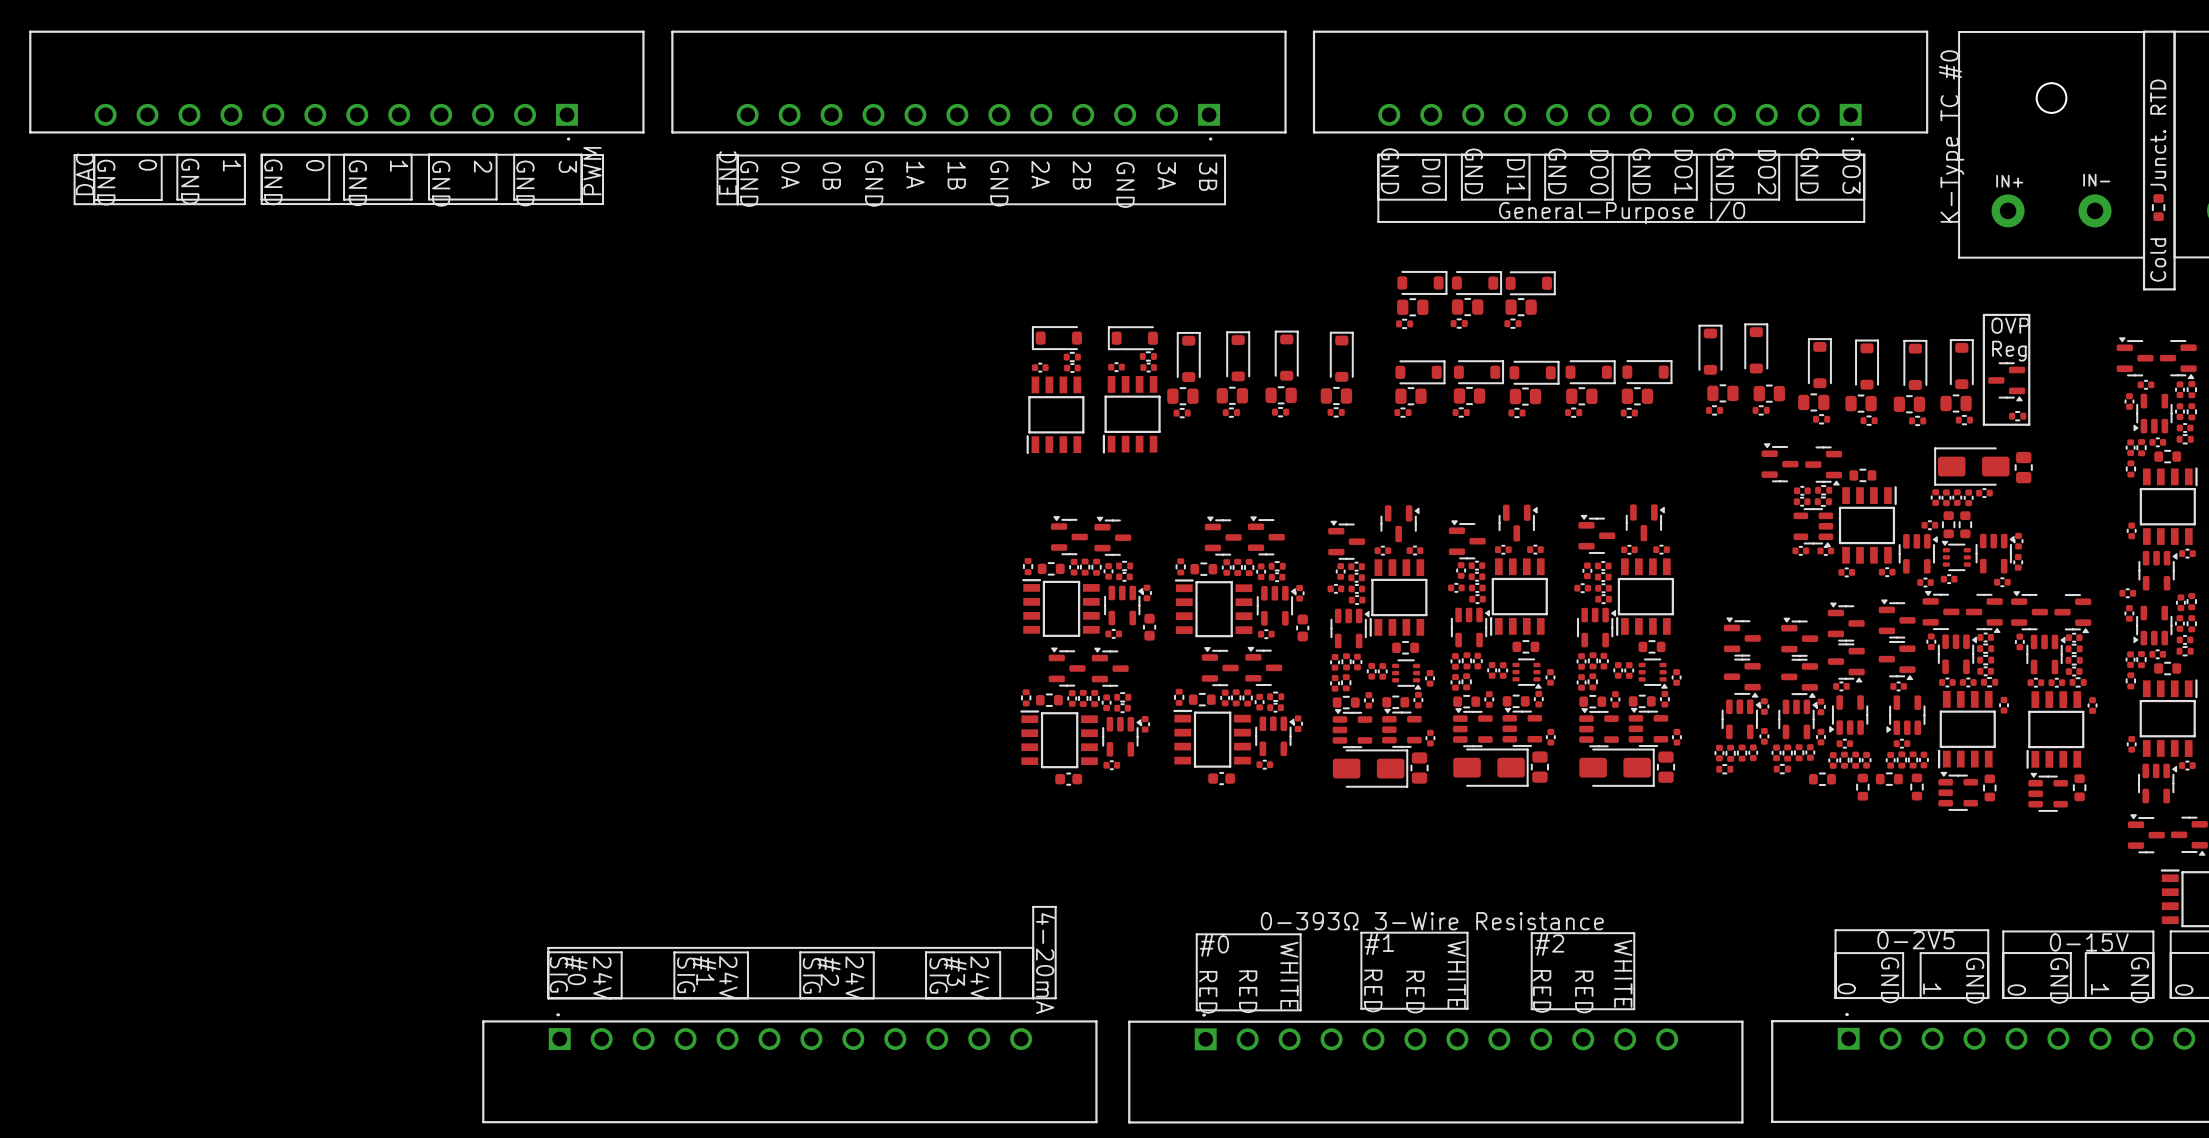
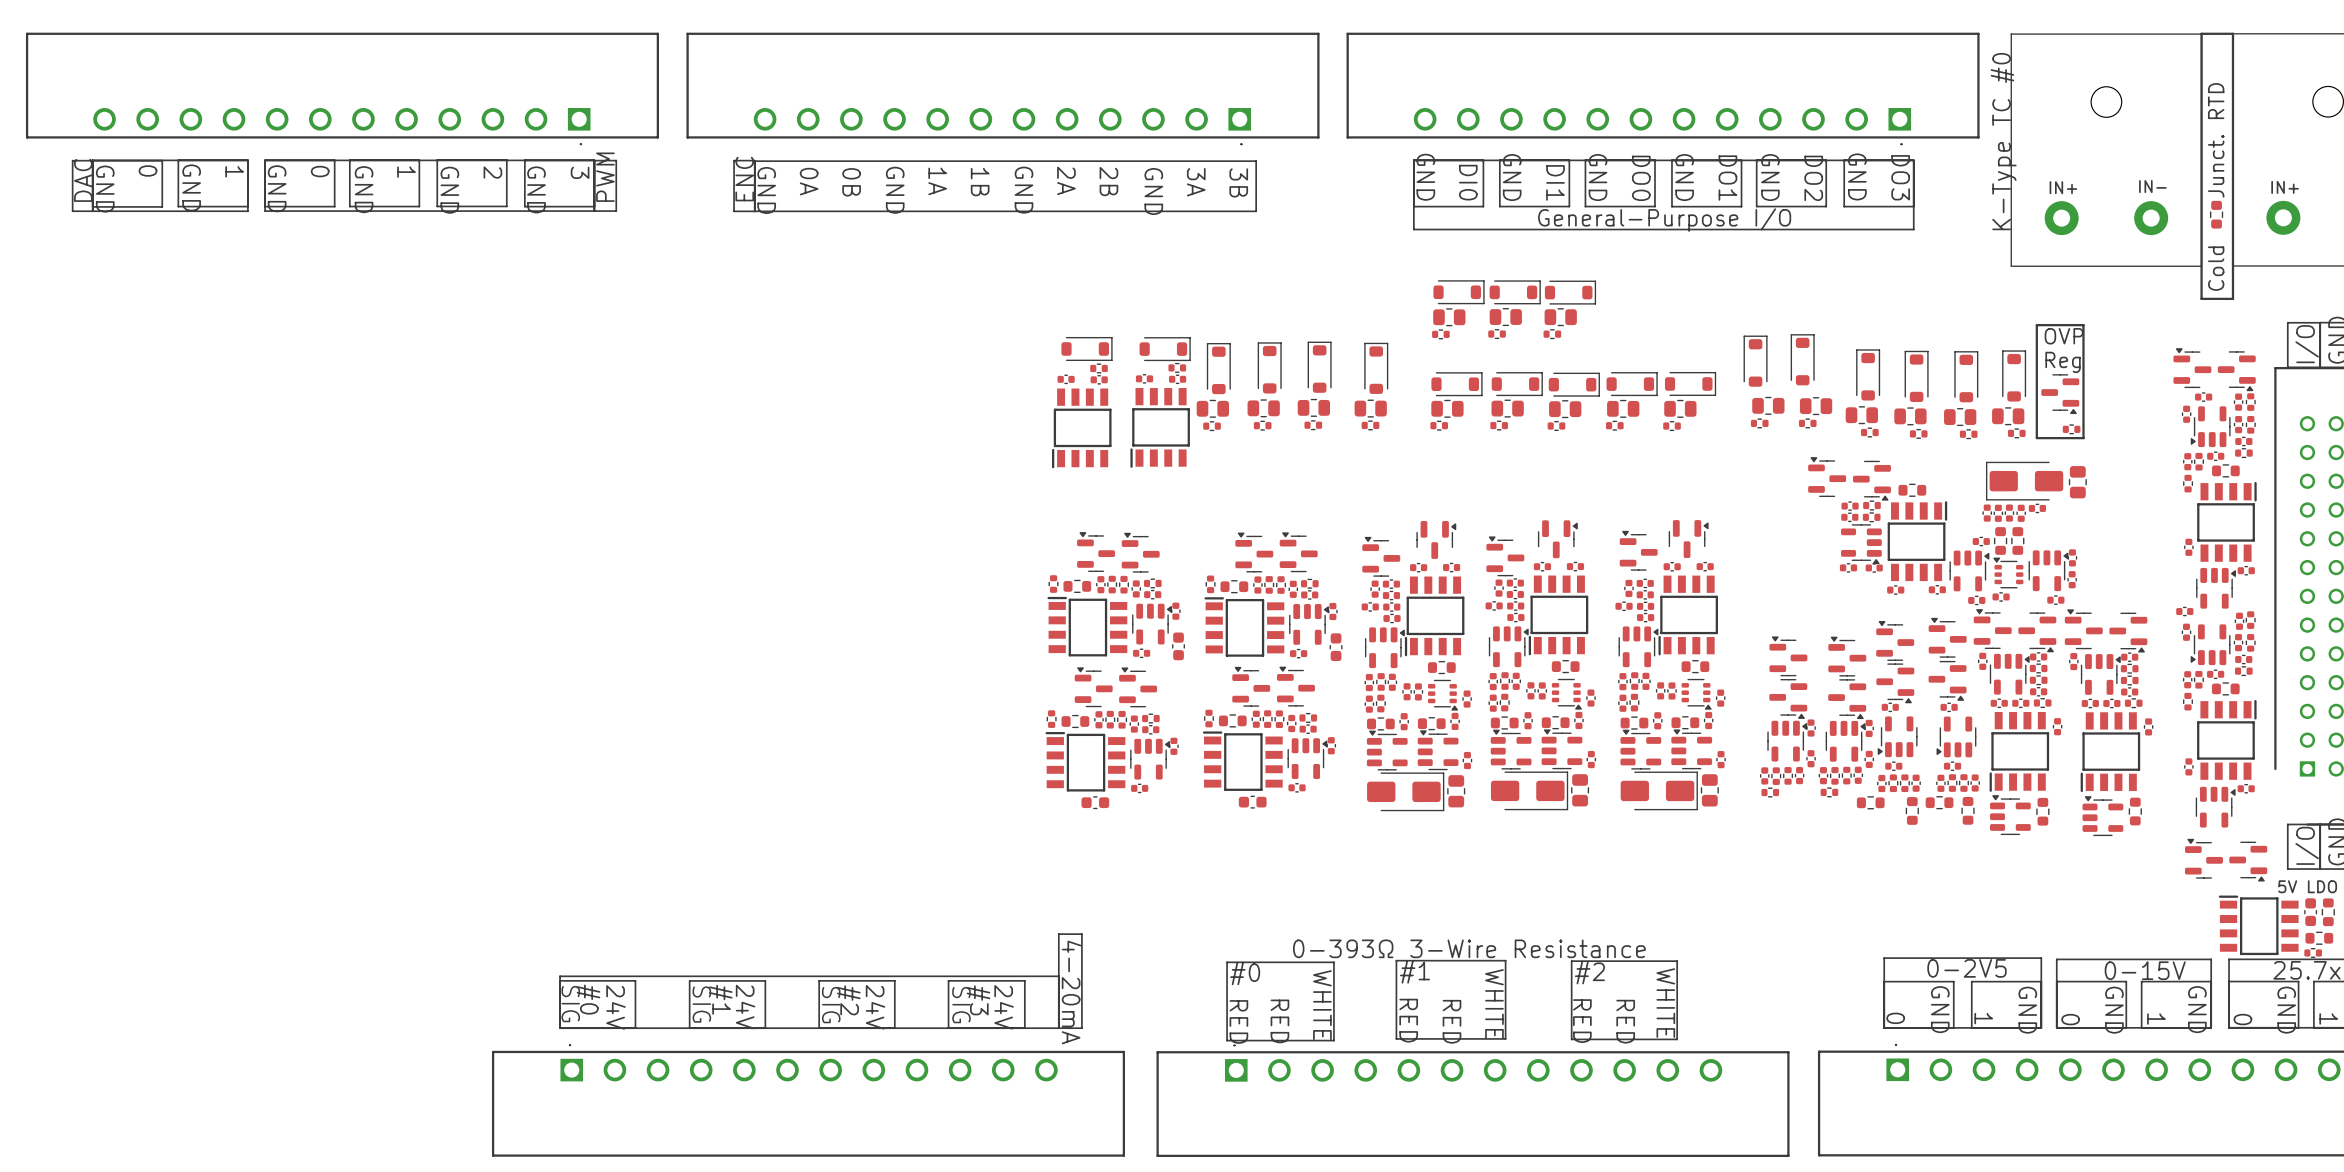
part rotation: 0° (1057, 338) -> 180° (1087, 348)
part rotation: 0° (1133, 338) -> 180° (1165, 349)

